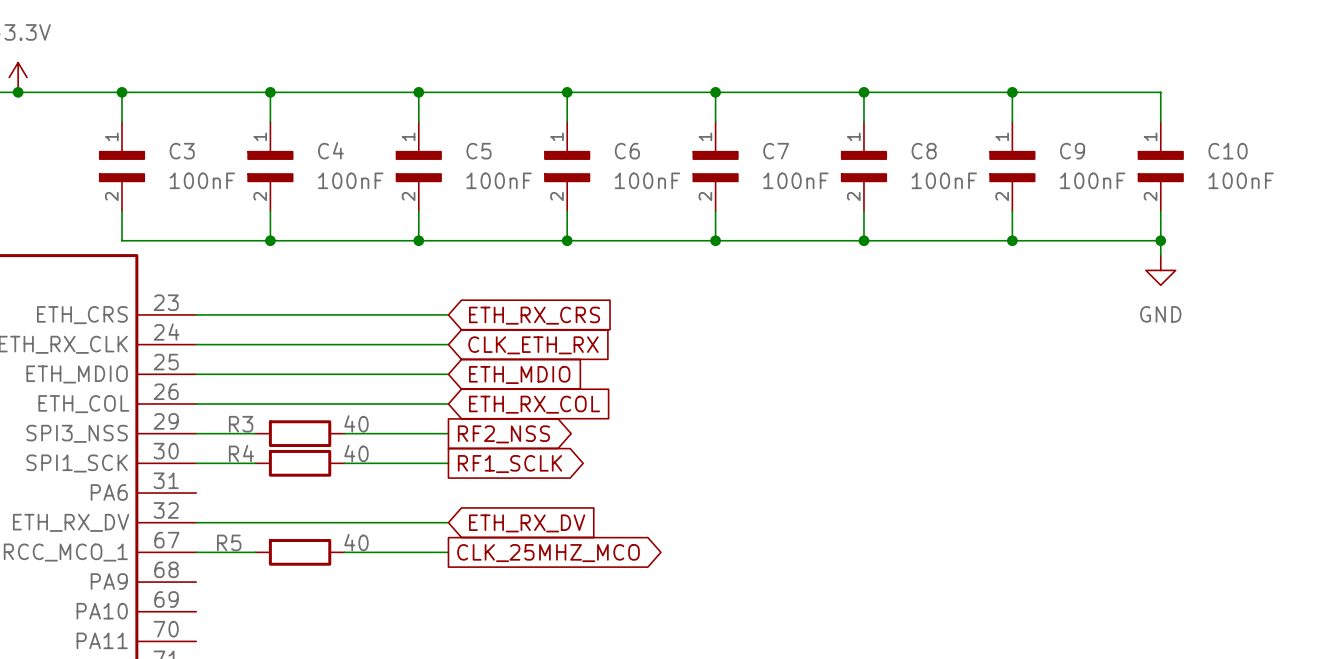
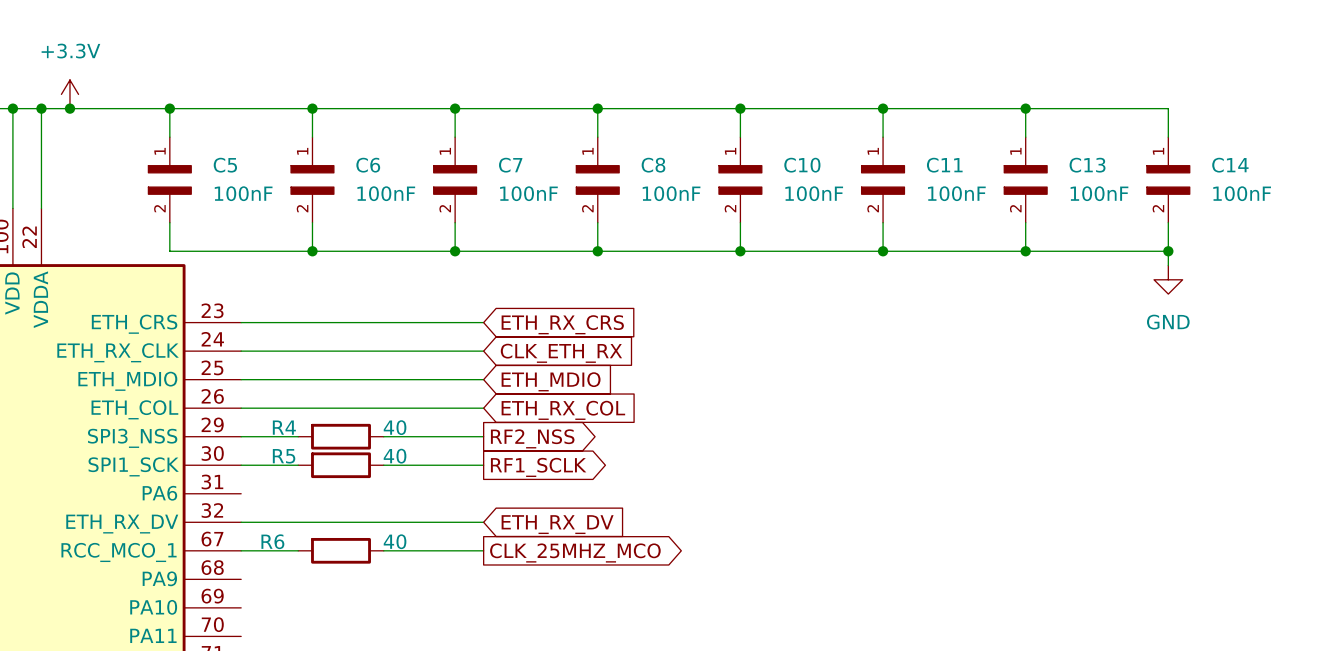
C4 name: C4 (330, 150) -> C6 (368, 165)
C3 name: C3 (182, 151) -> C5 (225, 165)
C5 name: C5 (478, 151) -> C7 (510, 165)
C6 name: C6 (627, 151) -> C8 (653, 165)
C7 name: C7 (776, 151) -> C10 (802, 165)
C8 name: C8 (924, 151) -> C11 (944, 165)
C9 name: C9 (1072, 151) -> C13 (1087, 165)
C10 name: C10 (1228, 151) -> C14 (1230, 165)
R3 name: R3 (241, 424) -> R4 (284, 427)
R4 name: R4 (241, 453) -> R5 (284, 456)
R5 name: R5 (229, 542) -> R6 (272, 541)

